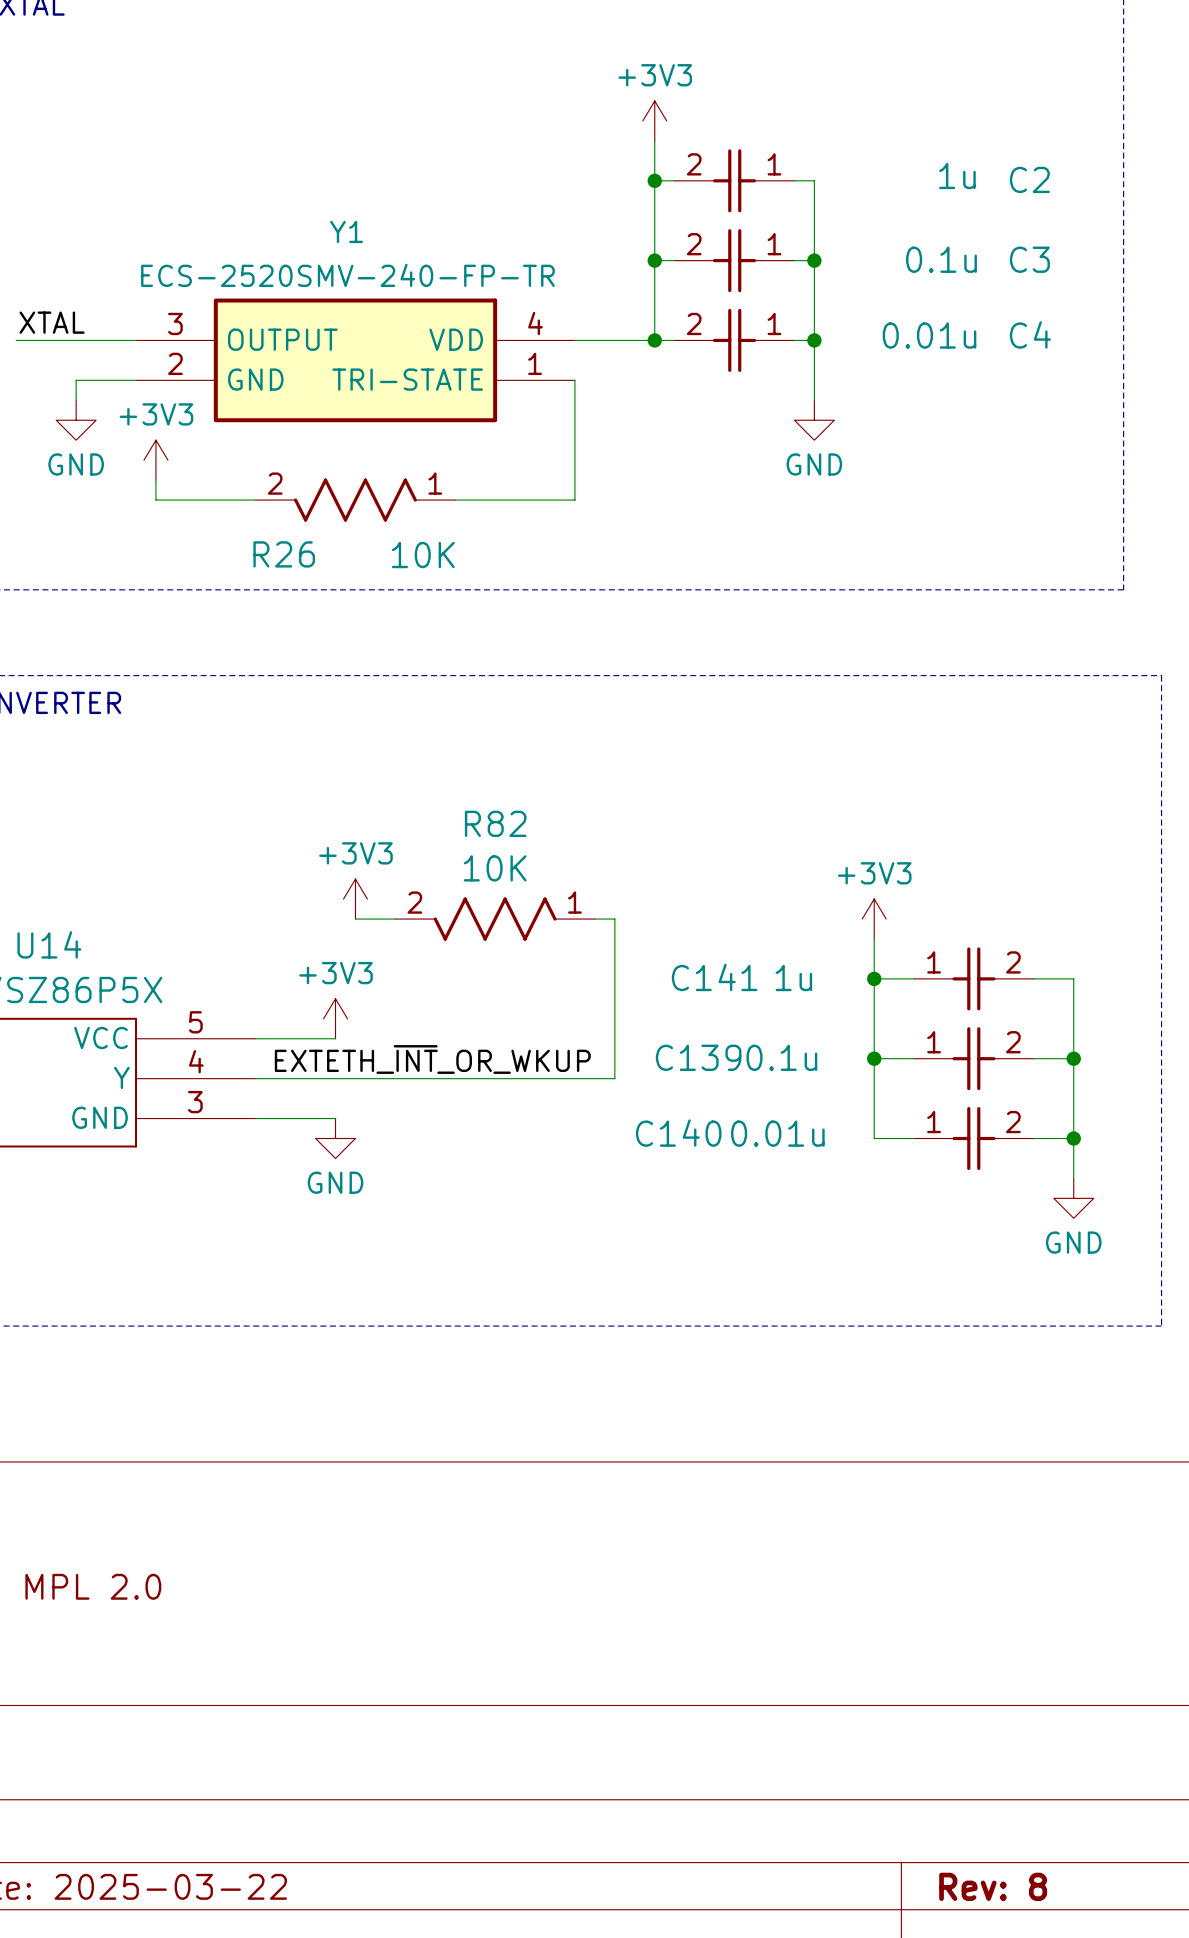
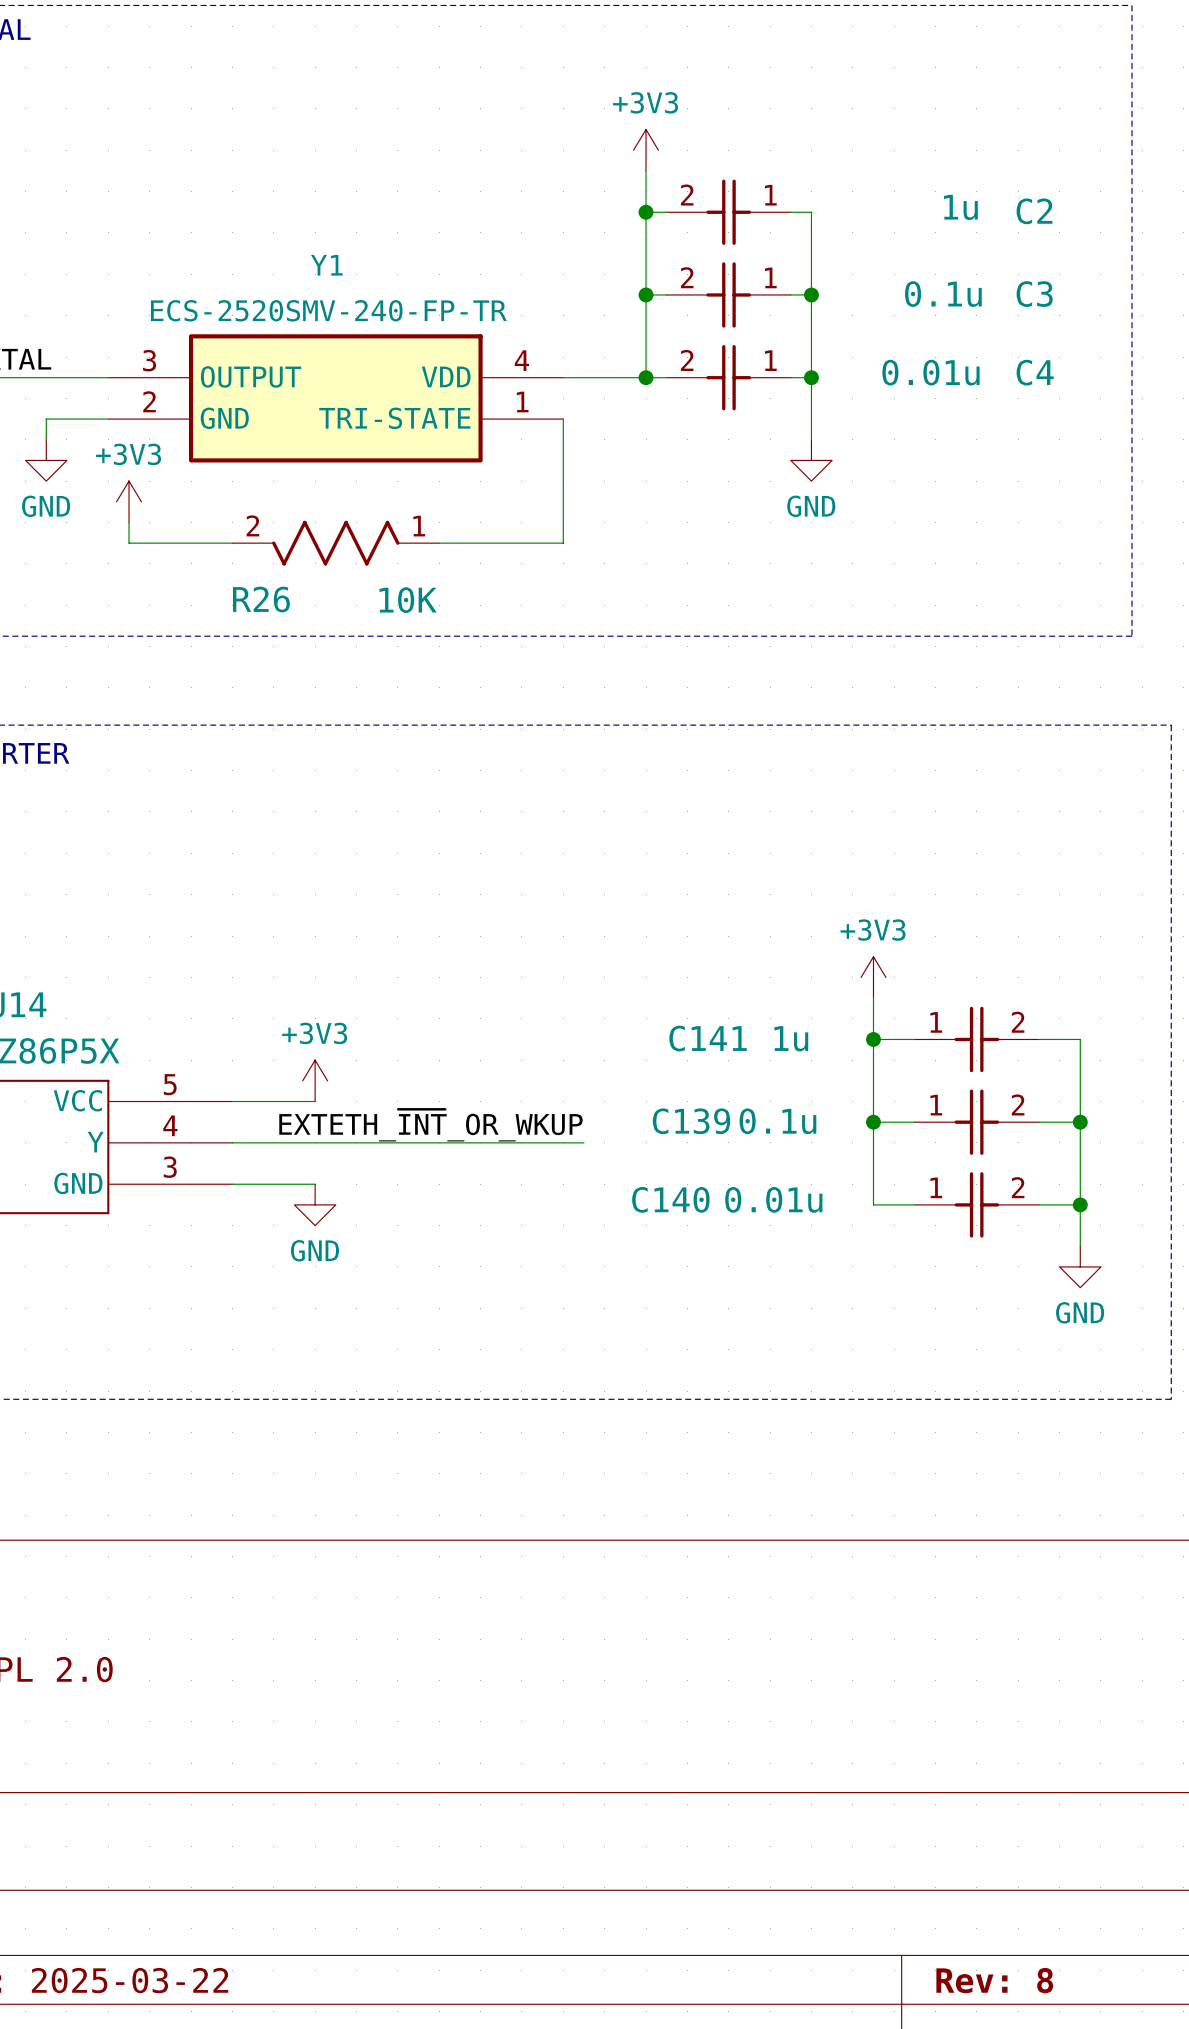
power symbol: +3V3 (355, 899) -> none
wire: (355, 919) (395, 919) -> none
R82: 10K (495, 919) -> none
wire: (594, 919) (614, 919) (614, 1078) (594, 1078) -> none

